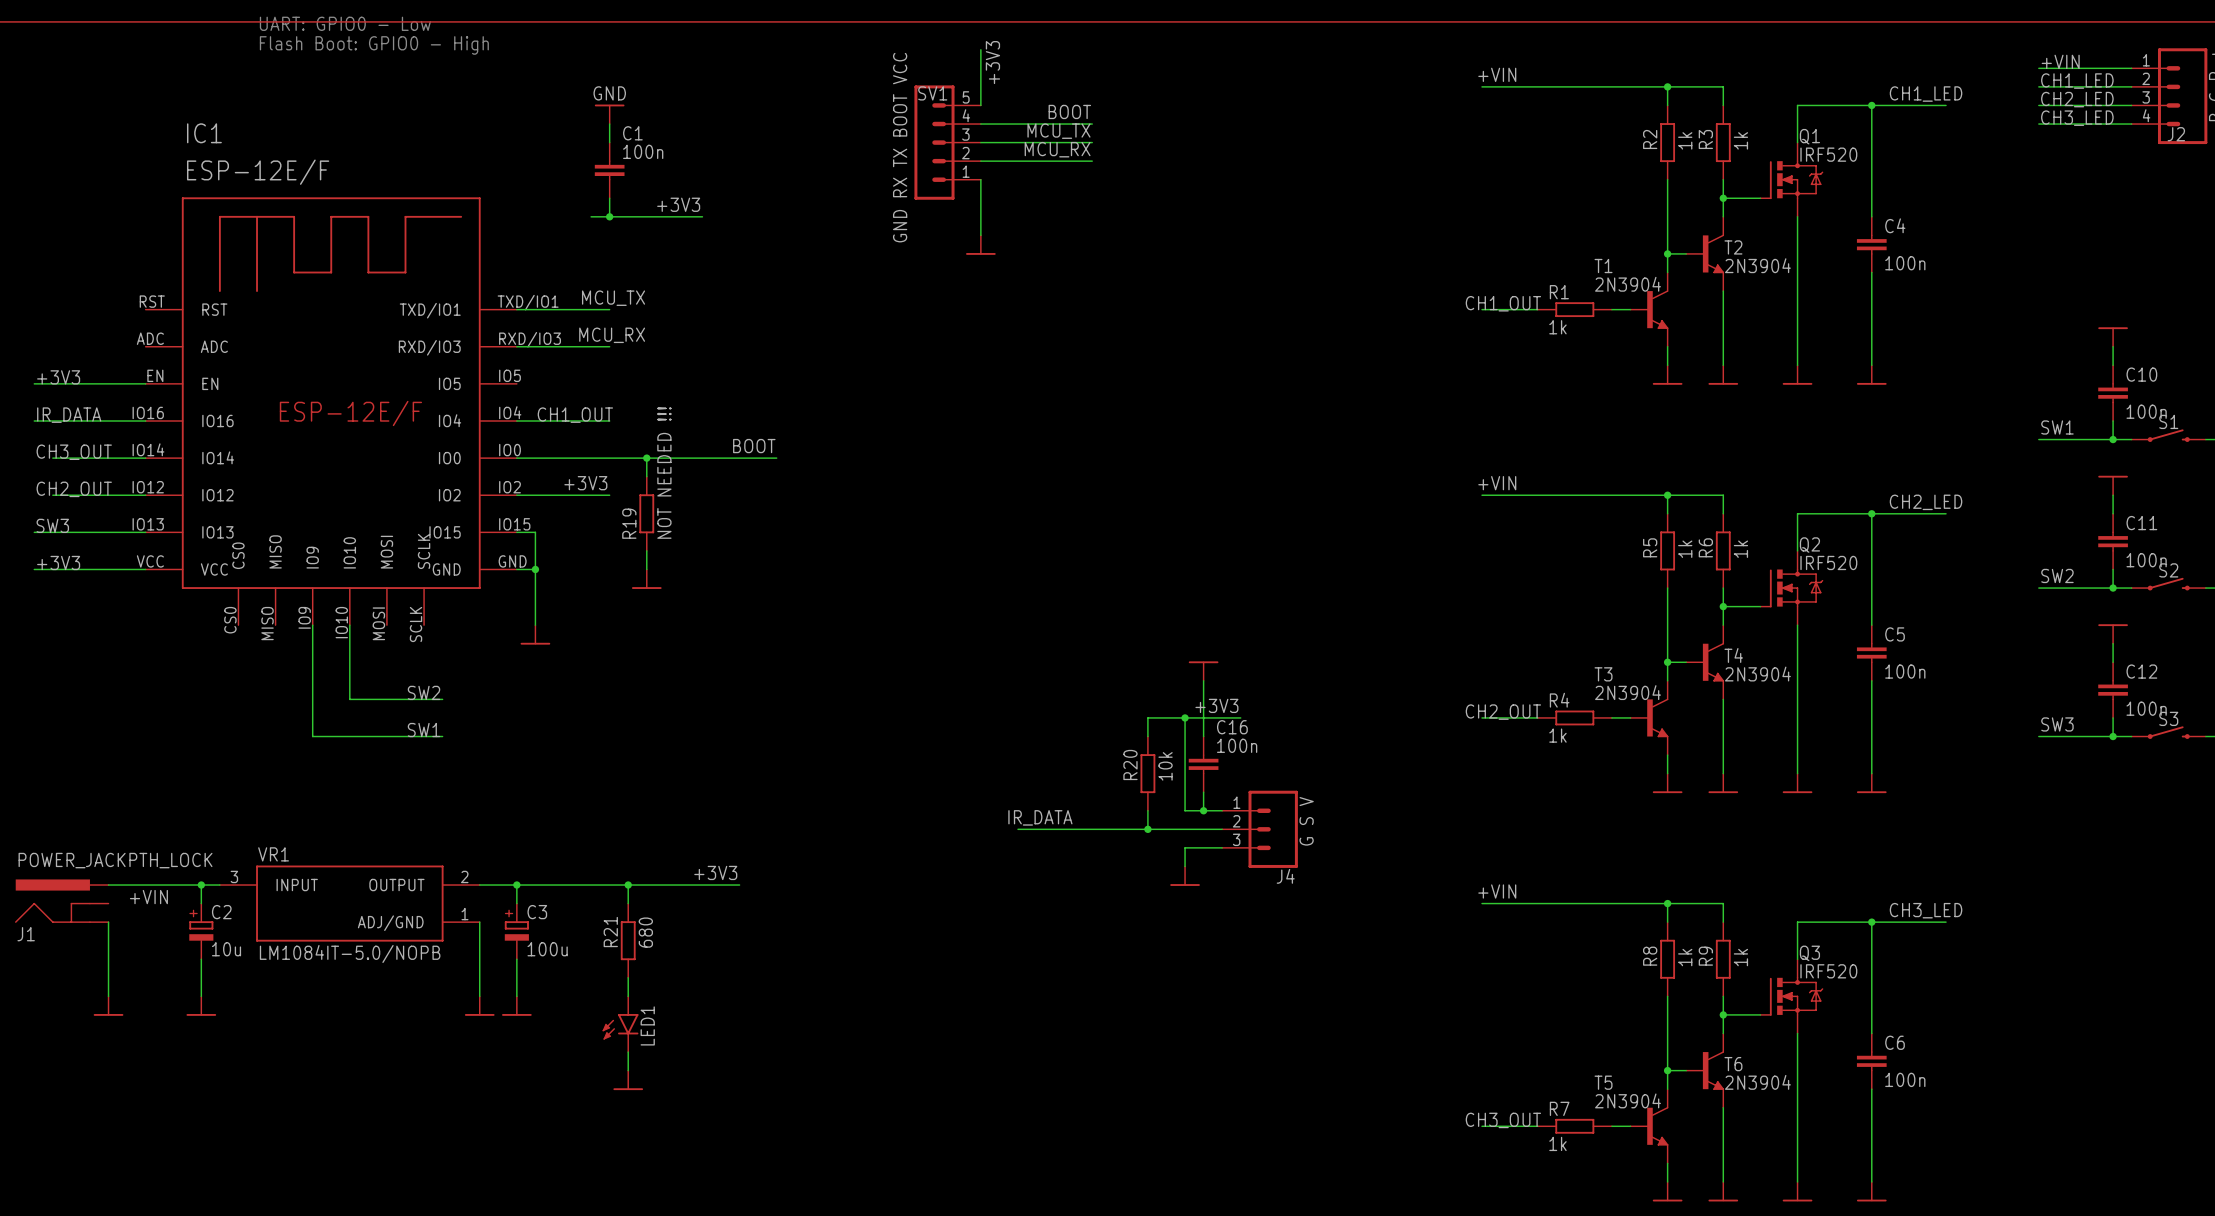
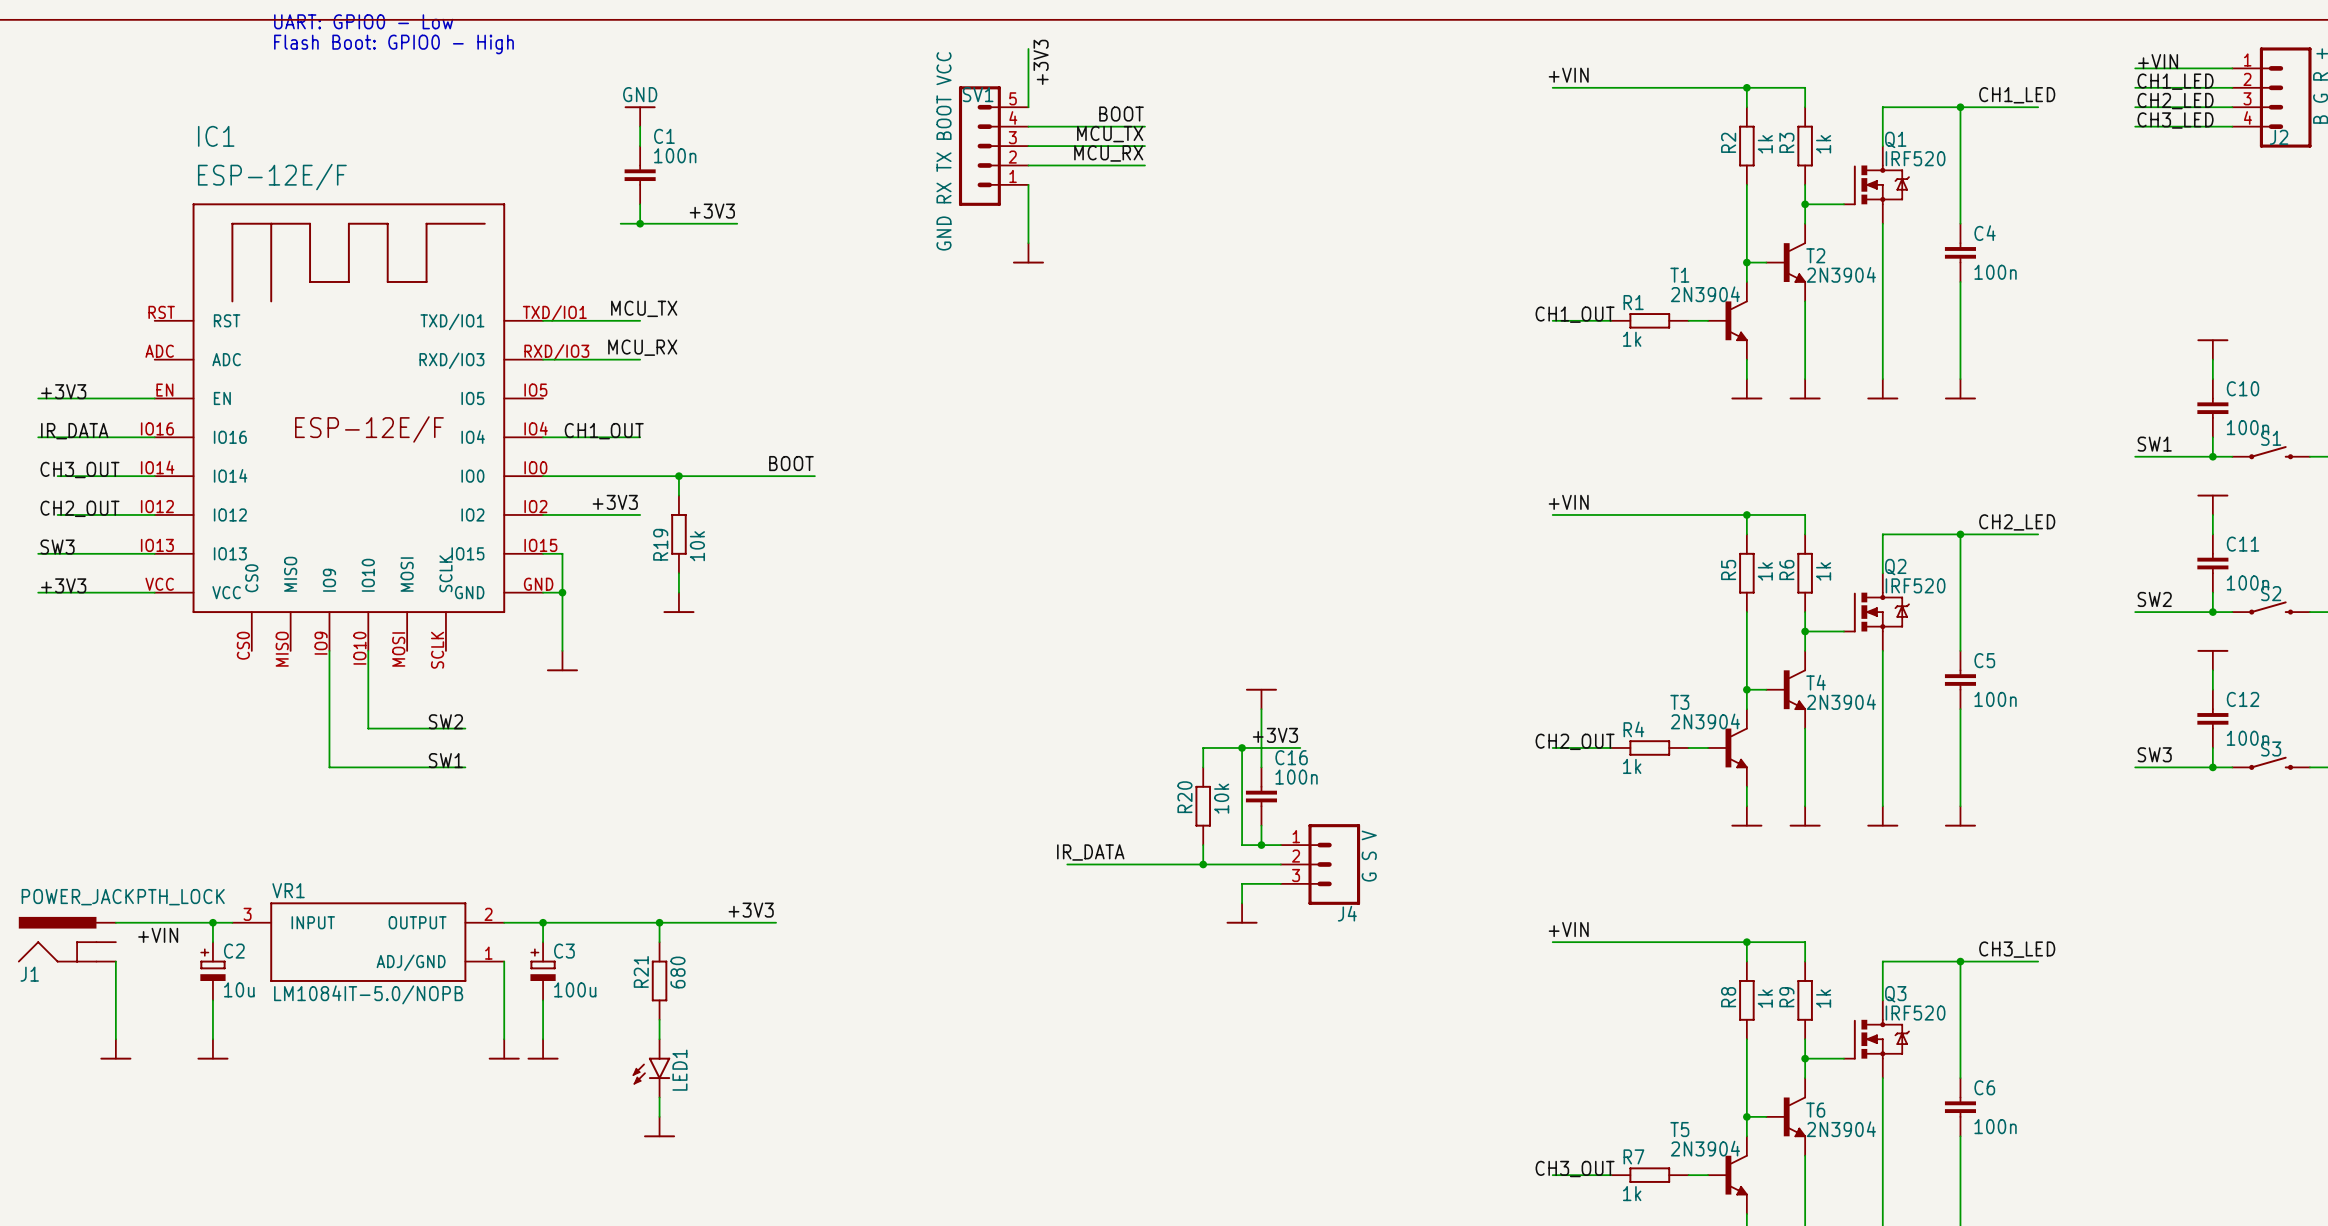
R19 value: NOT NEEDED !!! (664, 473) -> 10k (697, 546)

